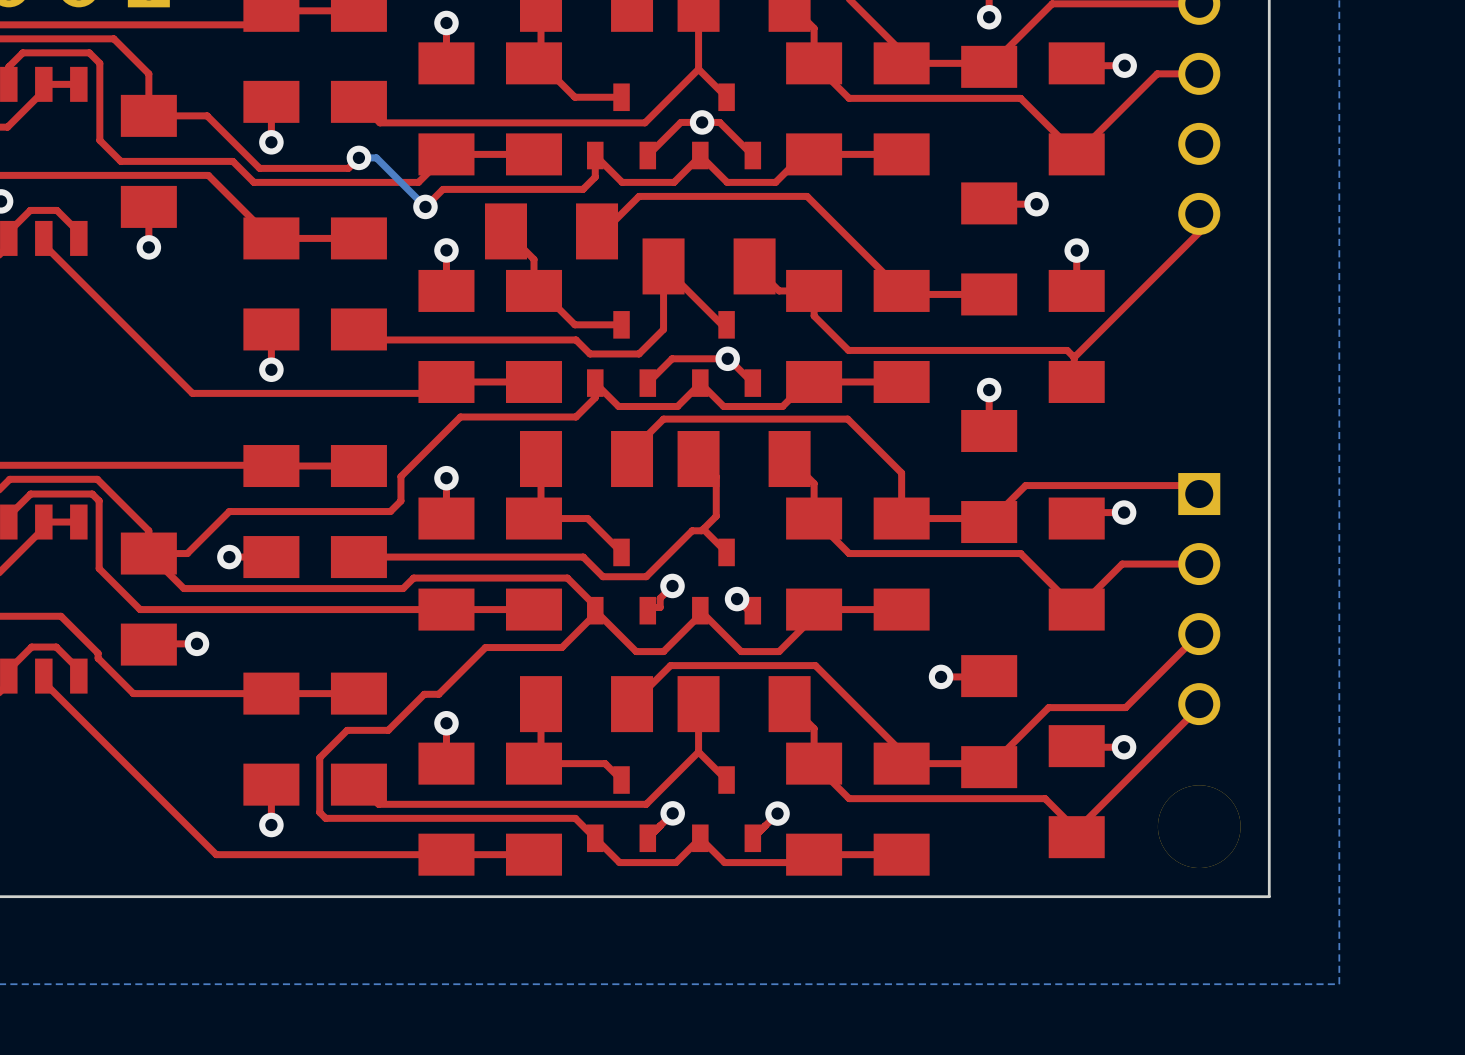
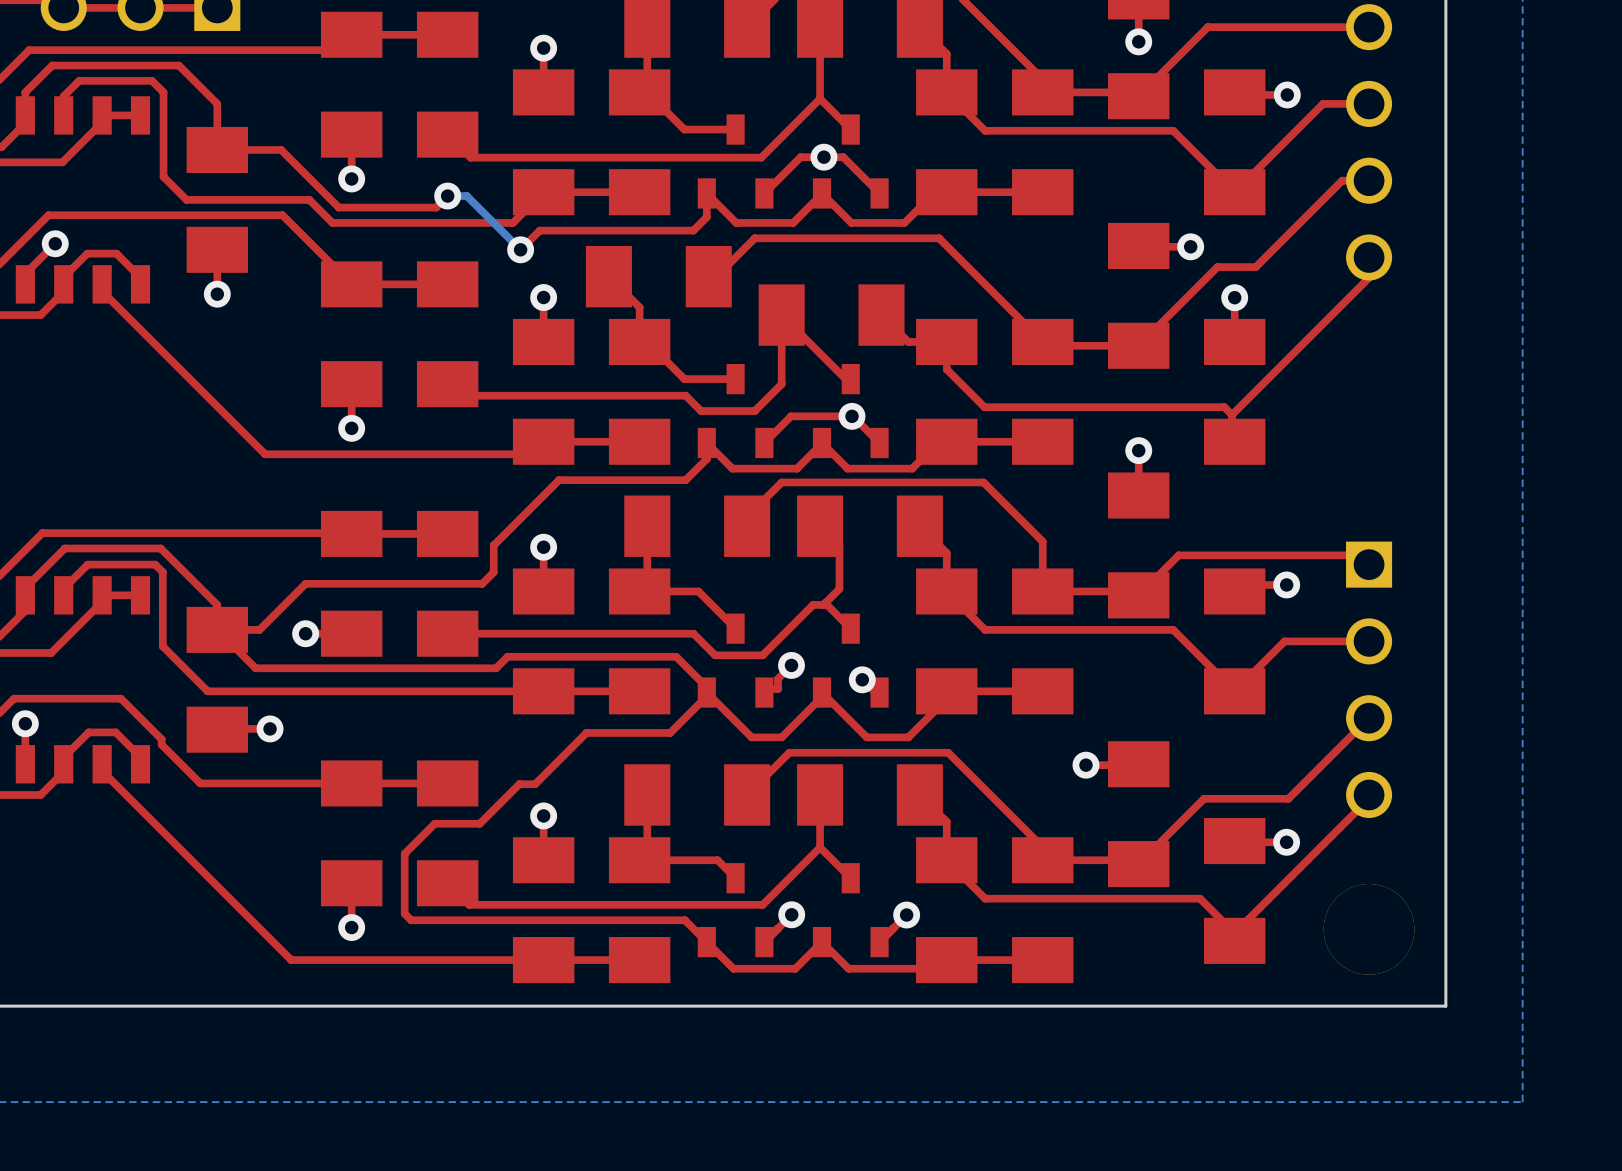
top track: none -> (1369, 180) (1342, 180) (1255, 267) (1217, 267) (1138, 345)

